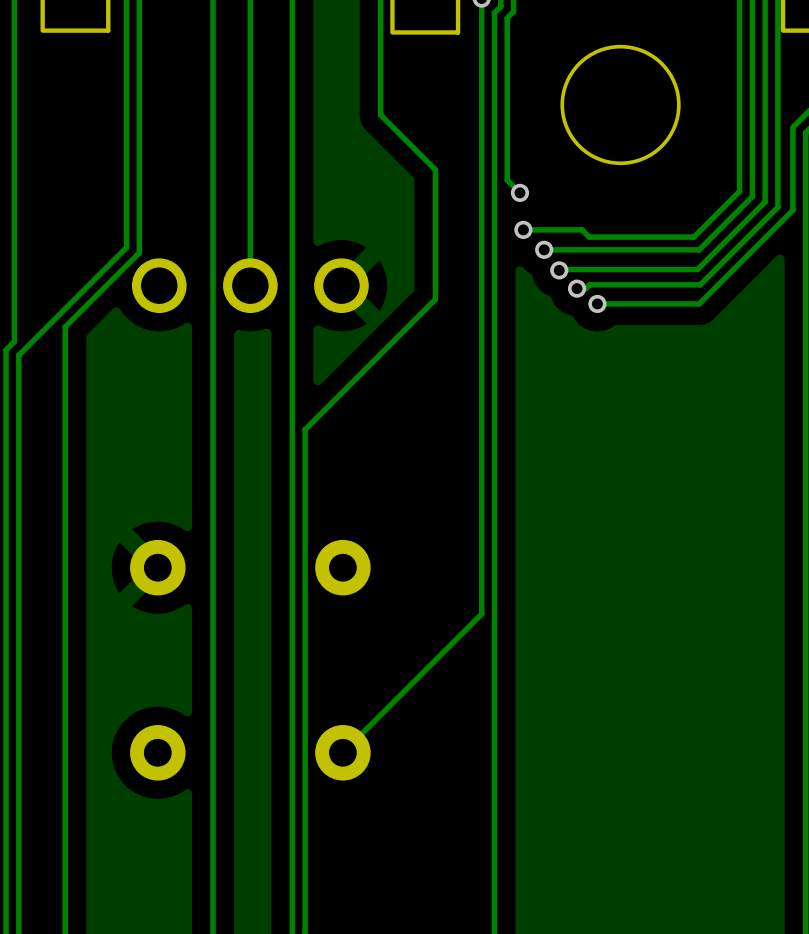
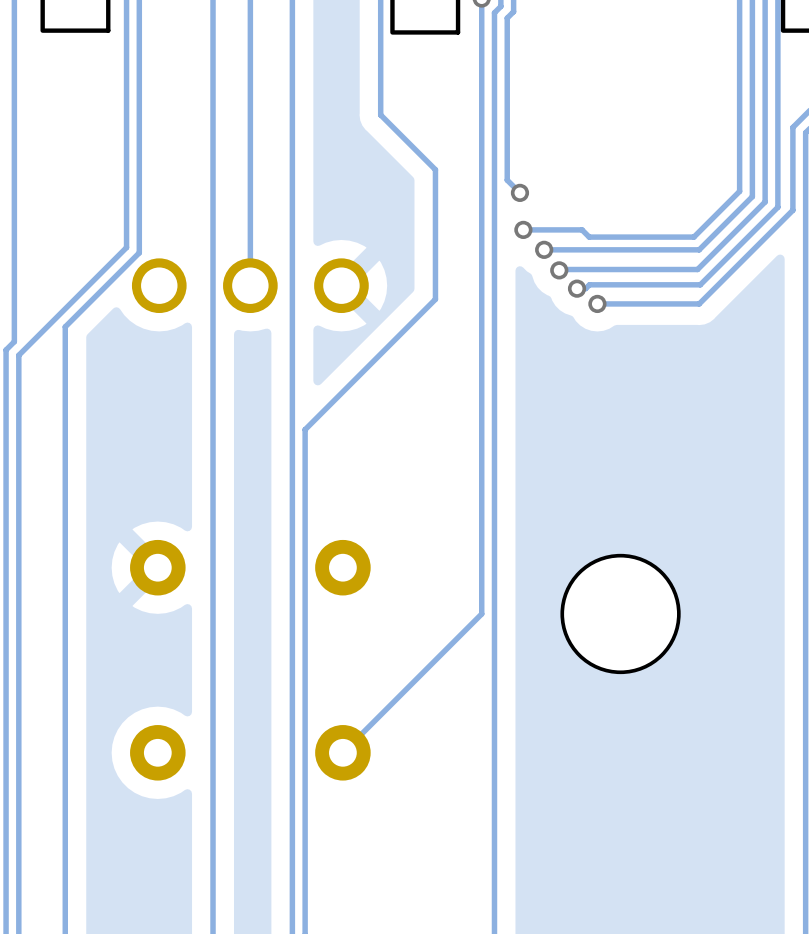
round board edge position: (620, 104) -> (620, 613)

